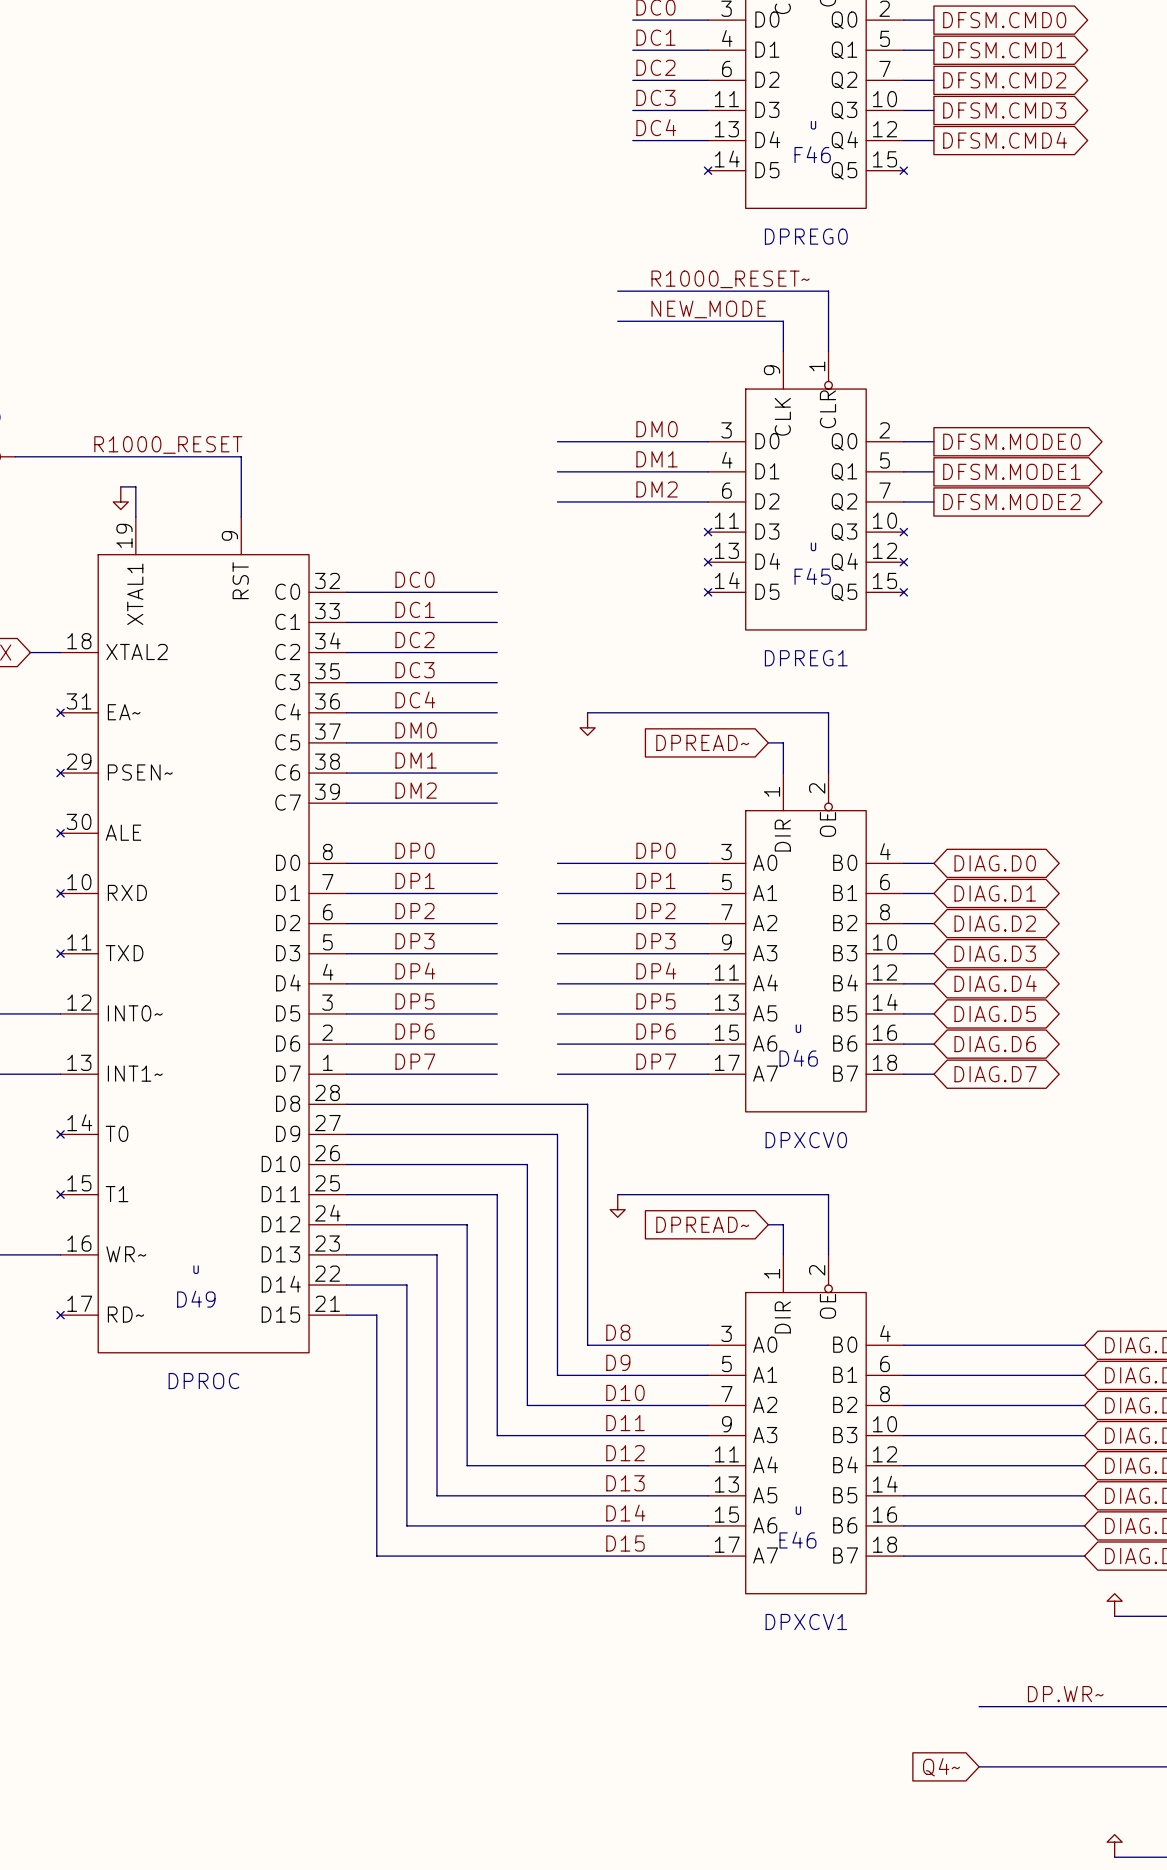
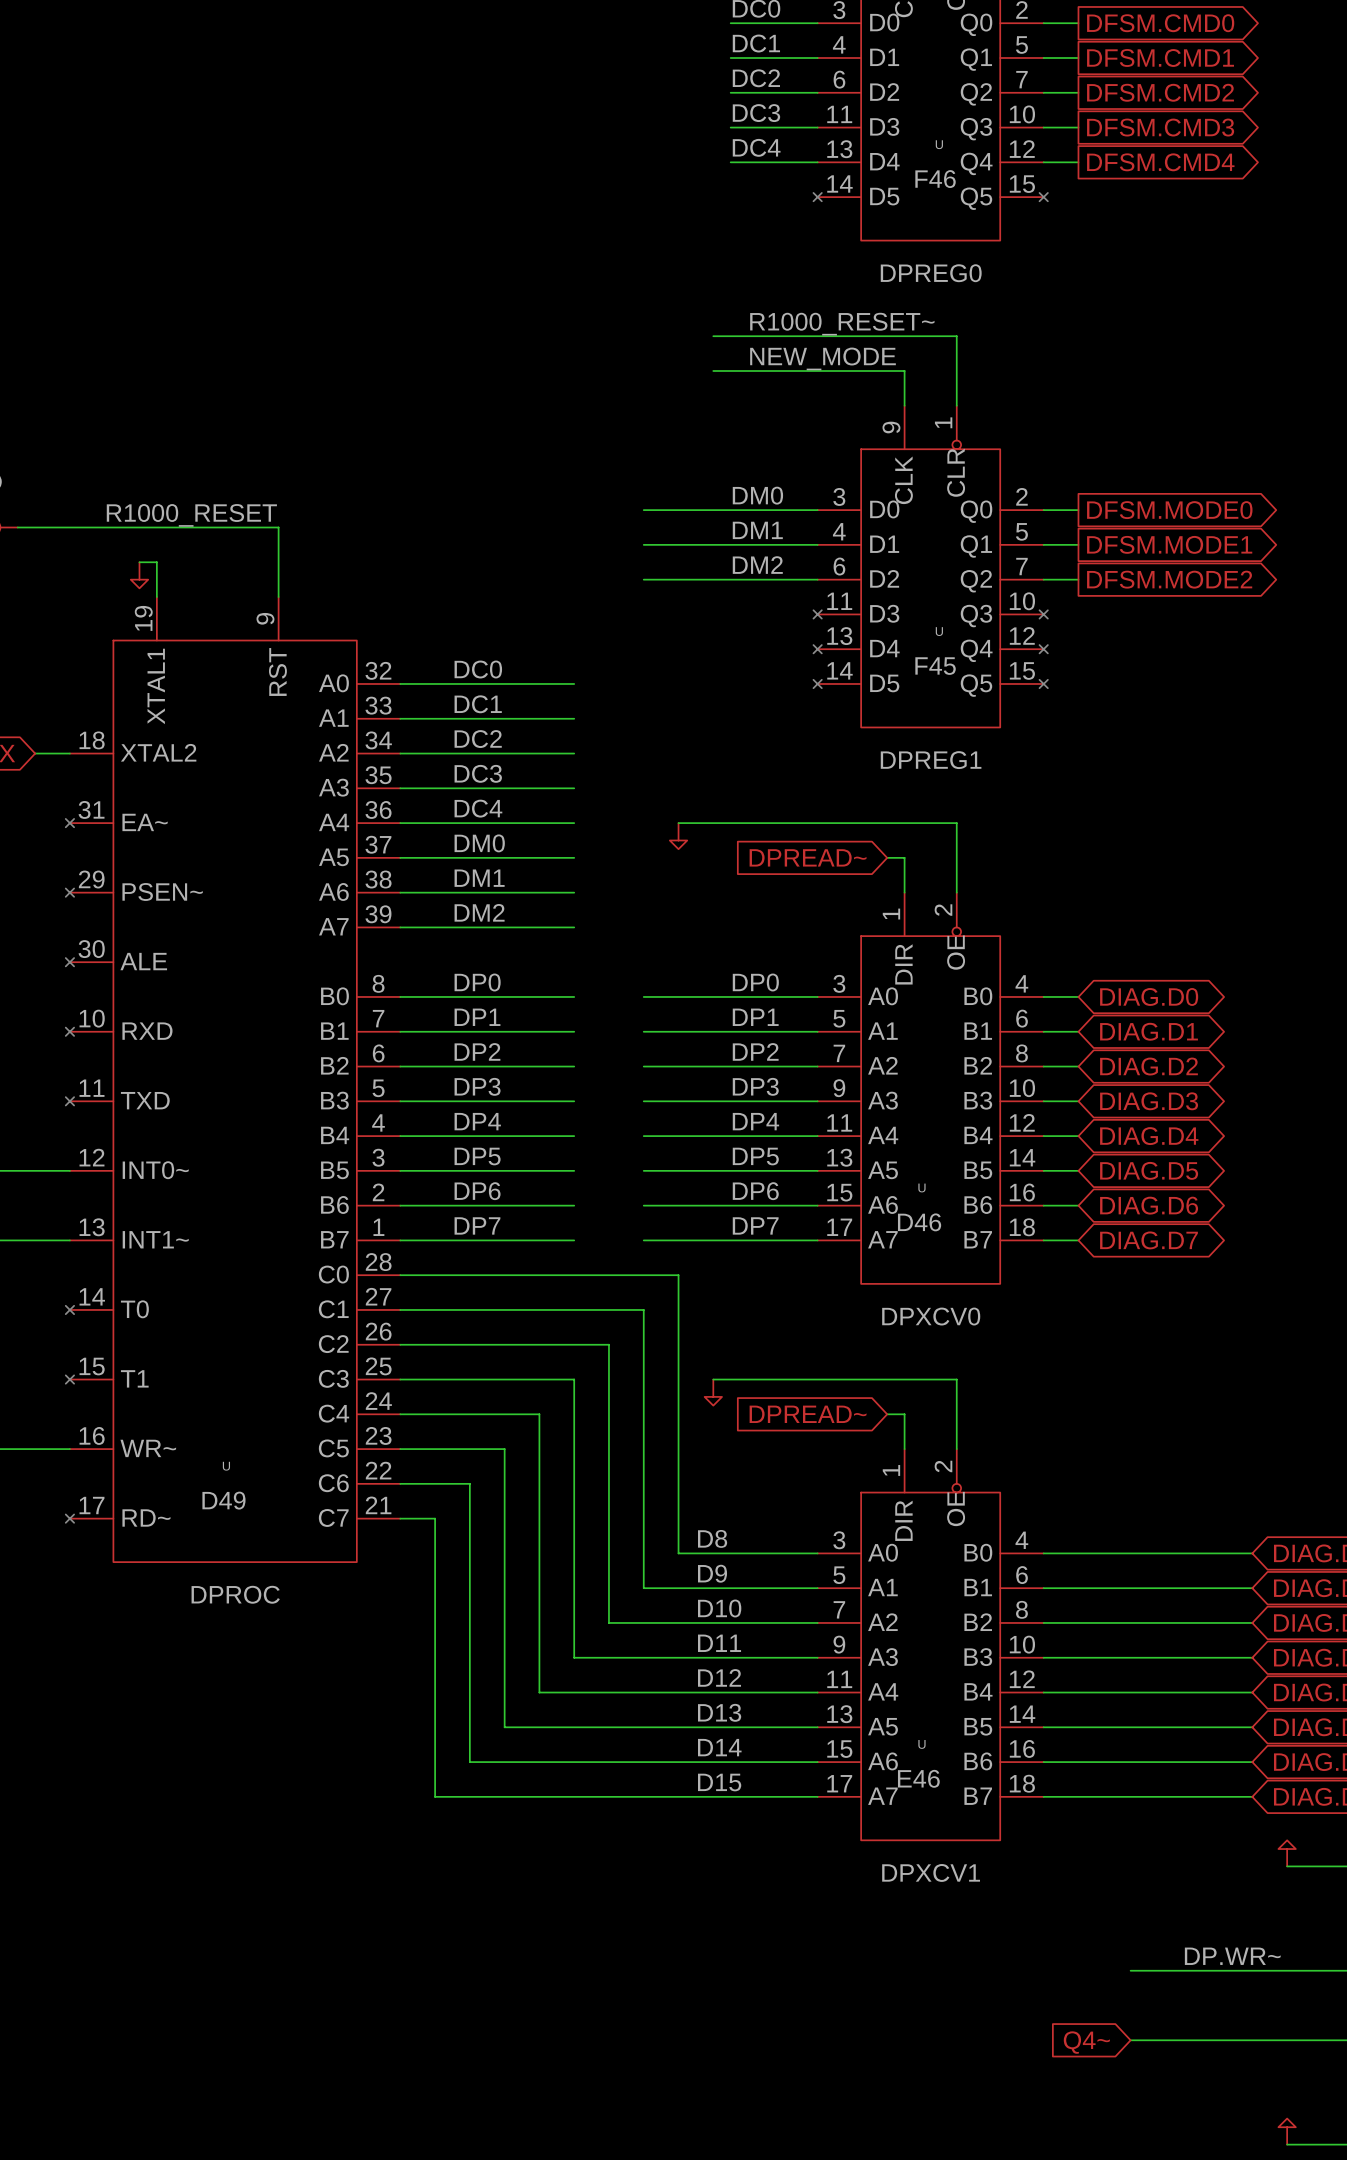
U symbol: [60, 517, 347, 1353] -> [69, 597, 401, 1563]

